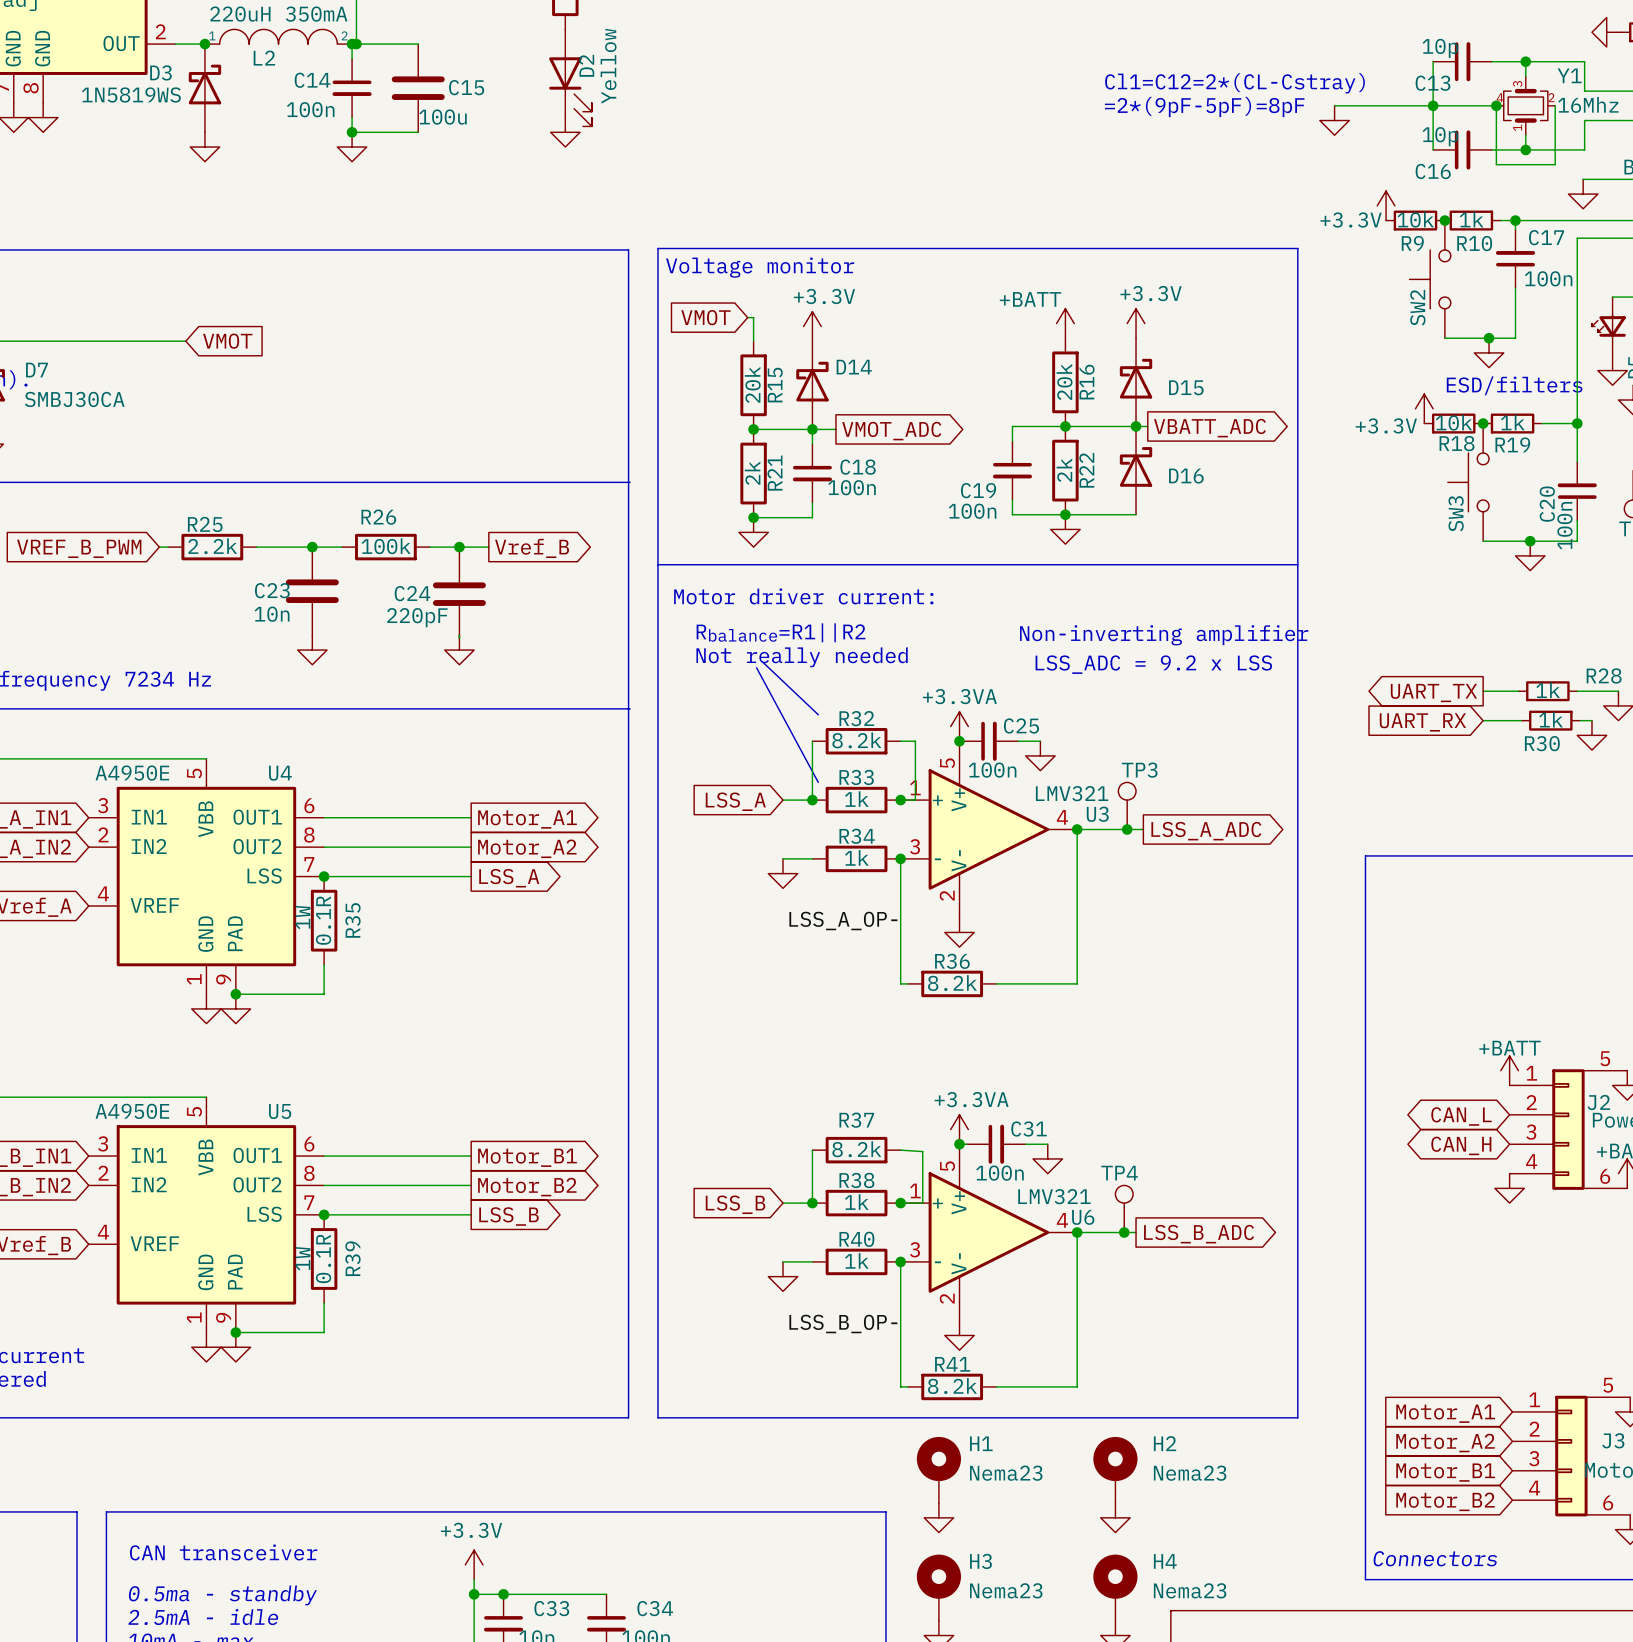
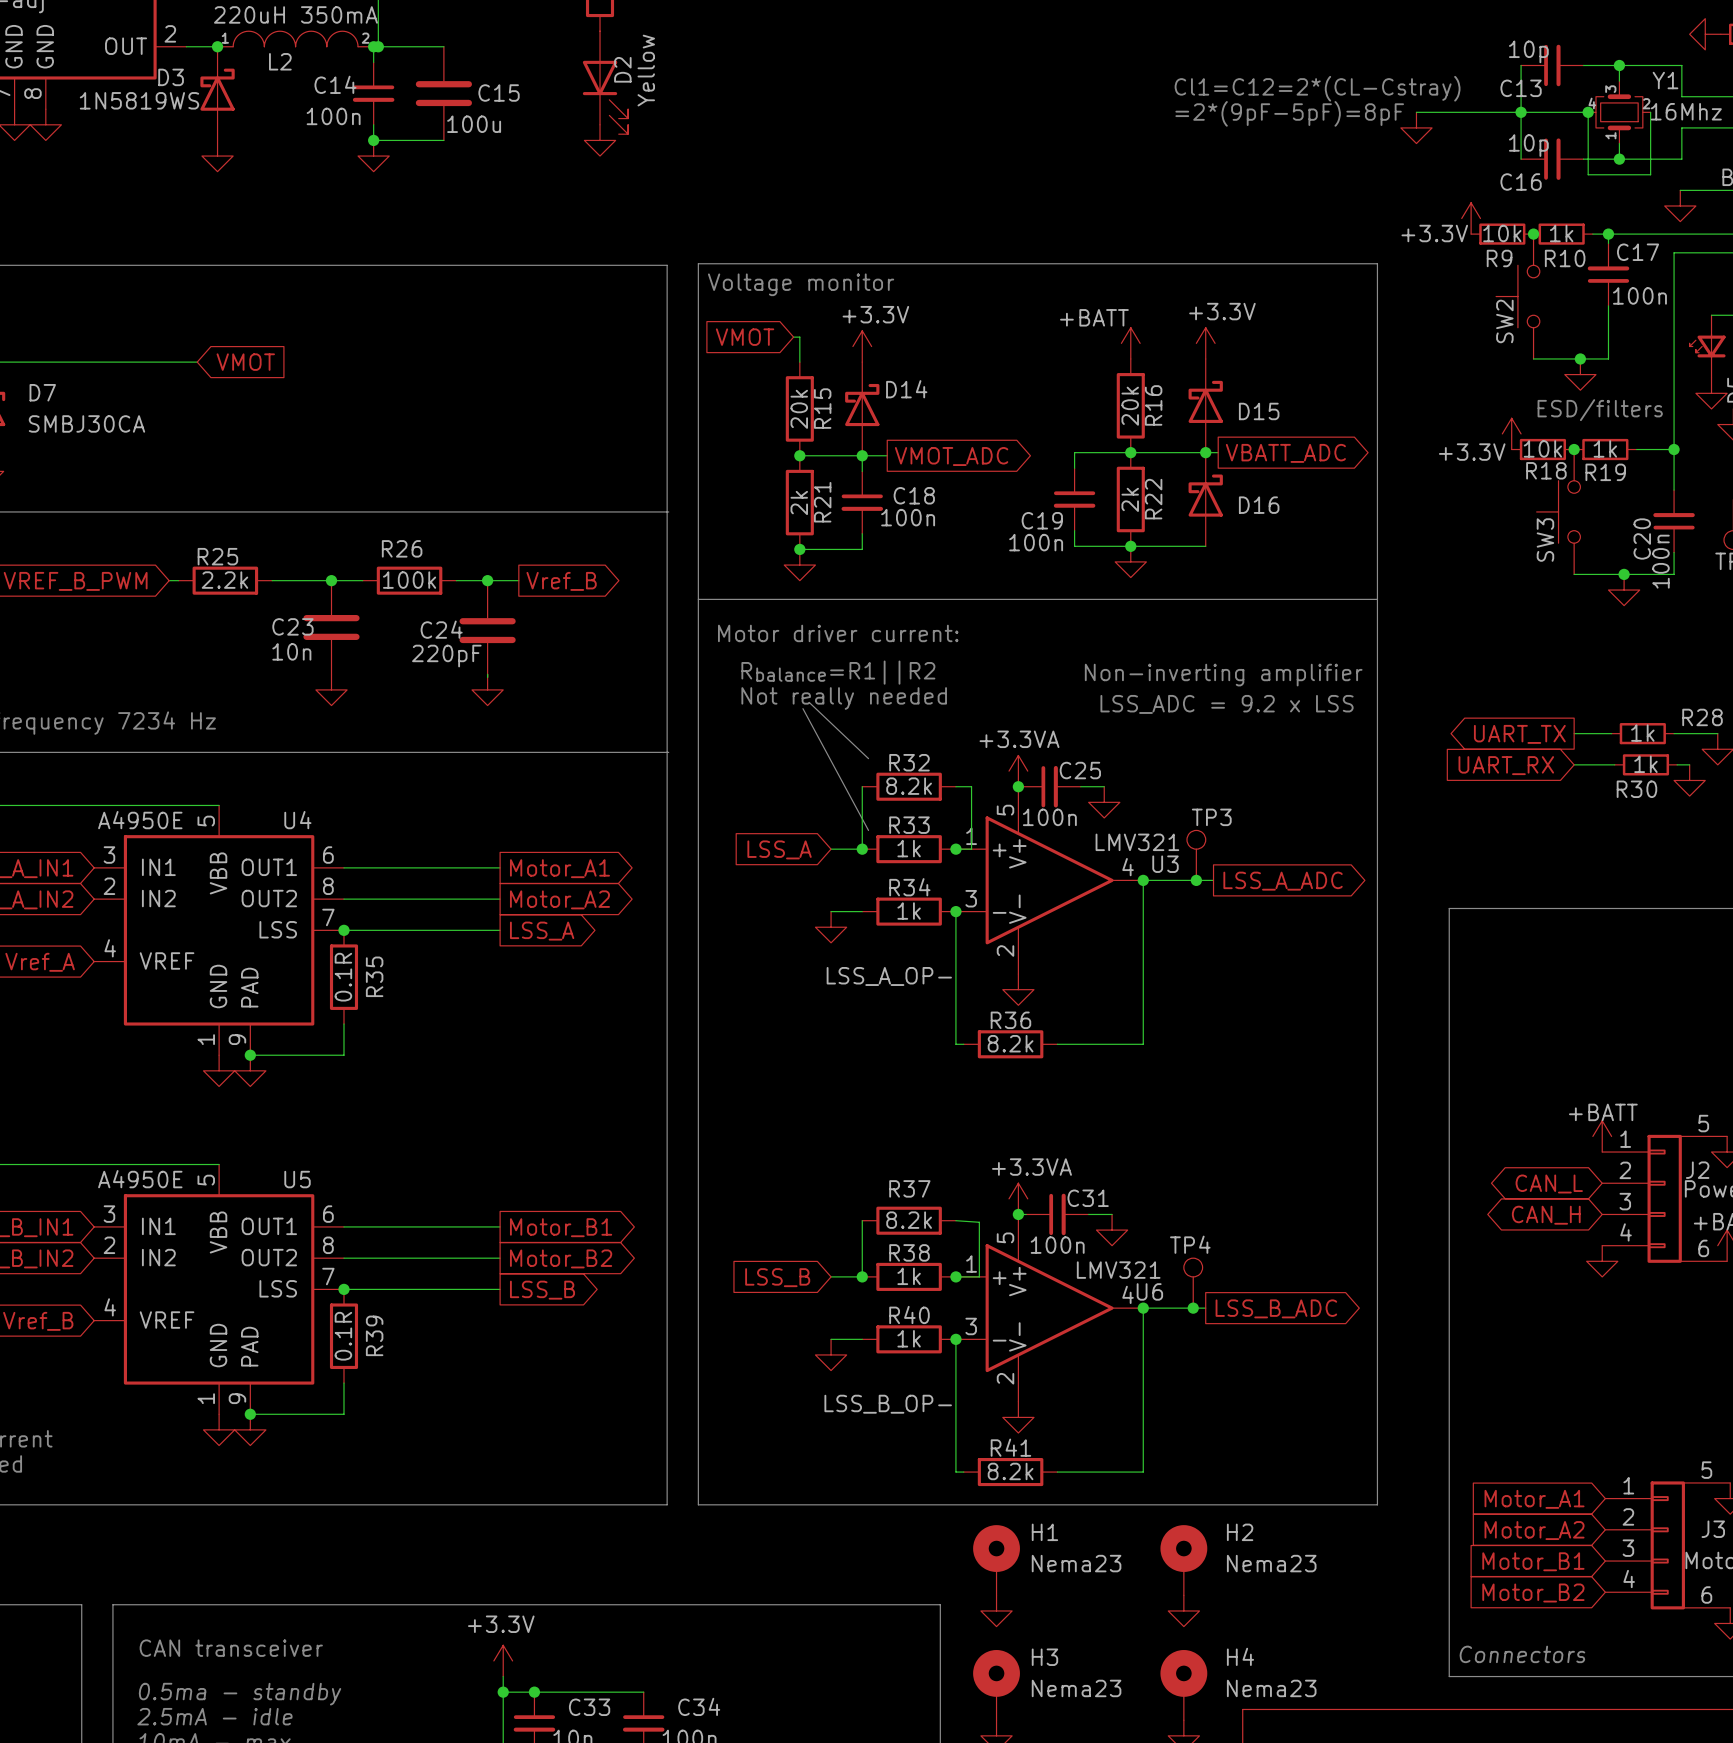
R35 text: 1W (302, 917) -> none
R39 text: 1W (302, 1258) -> none

